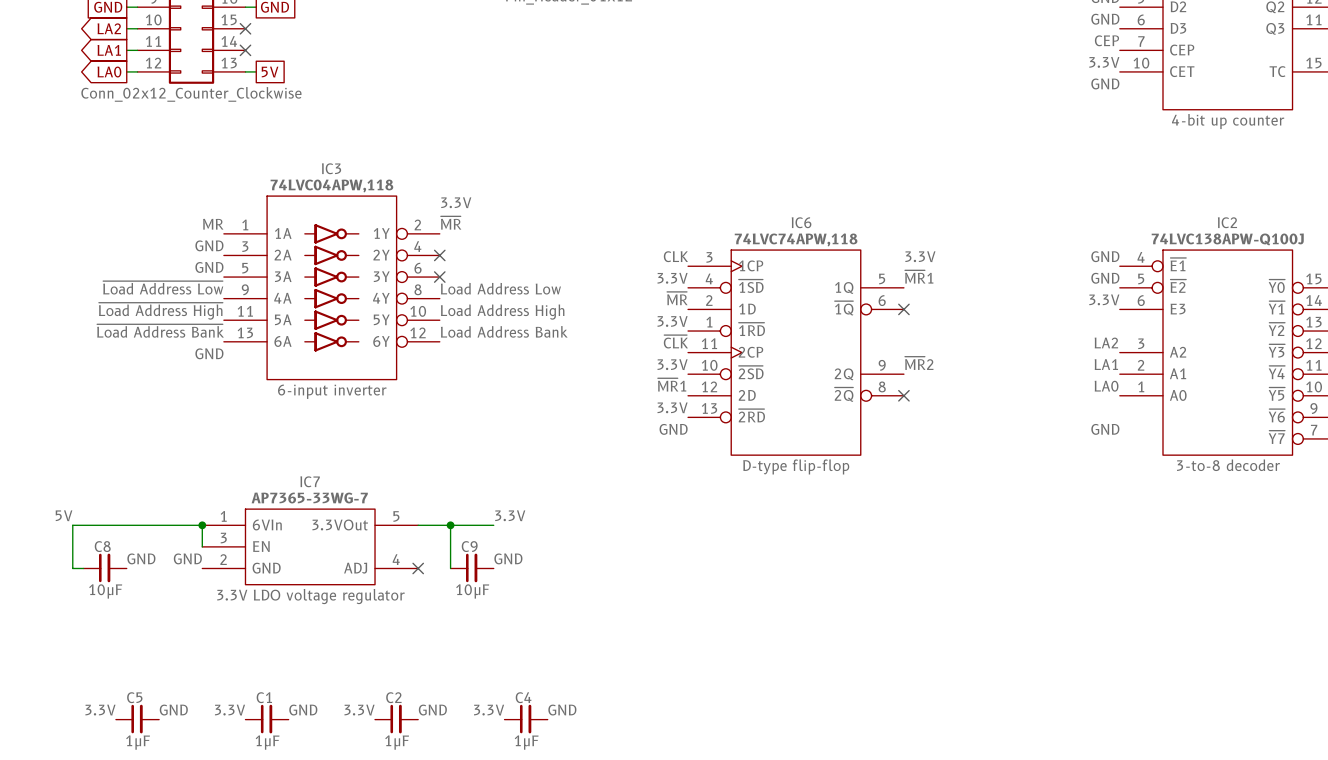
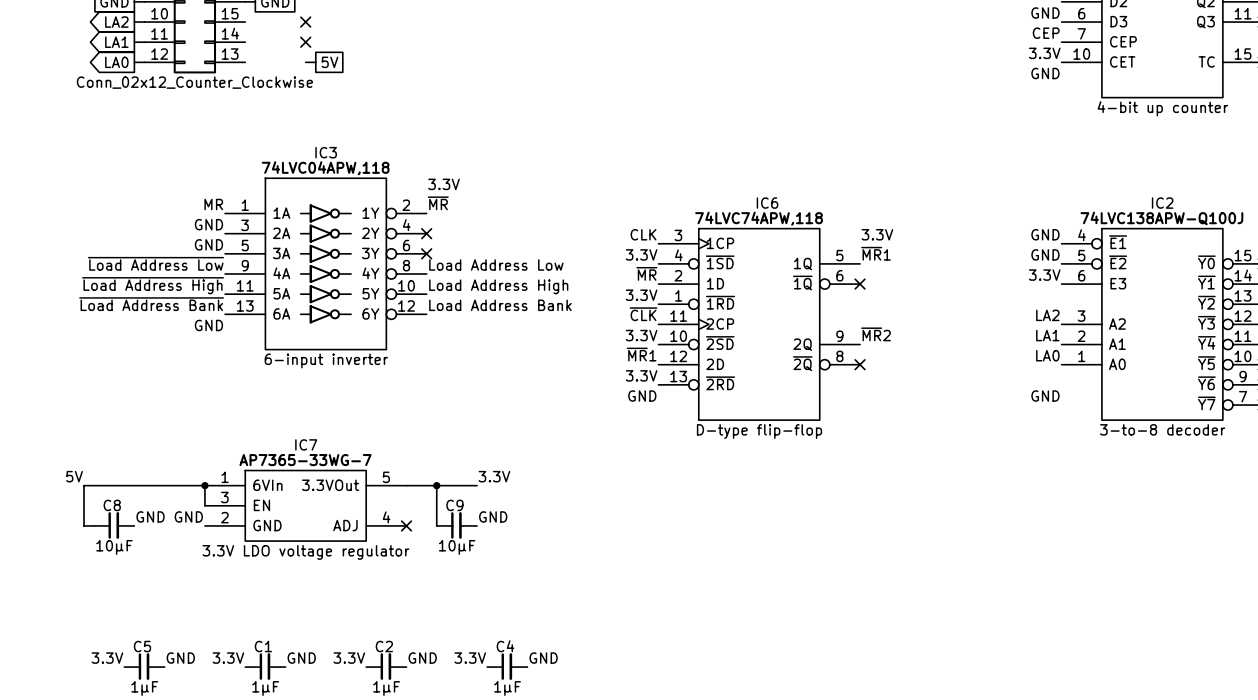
no-connect mark: (245, 28) -> none
no-connect mark: none -> (305, 22)
no-connect mark: (245, 50) -> none
no-connect mark: none -> (305, 42)
wire: (245, 71) (256, 71) -> (305, 62) (315, 62)
global label position: 5V (270, 72) -> 5V (329, 62)

